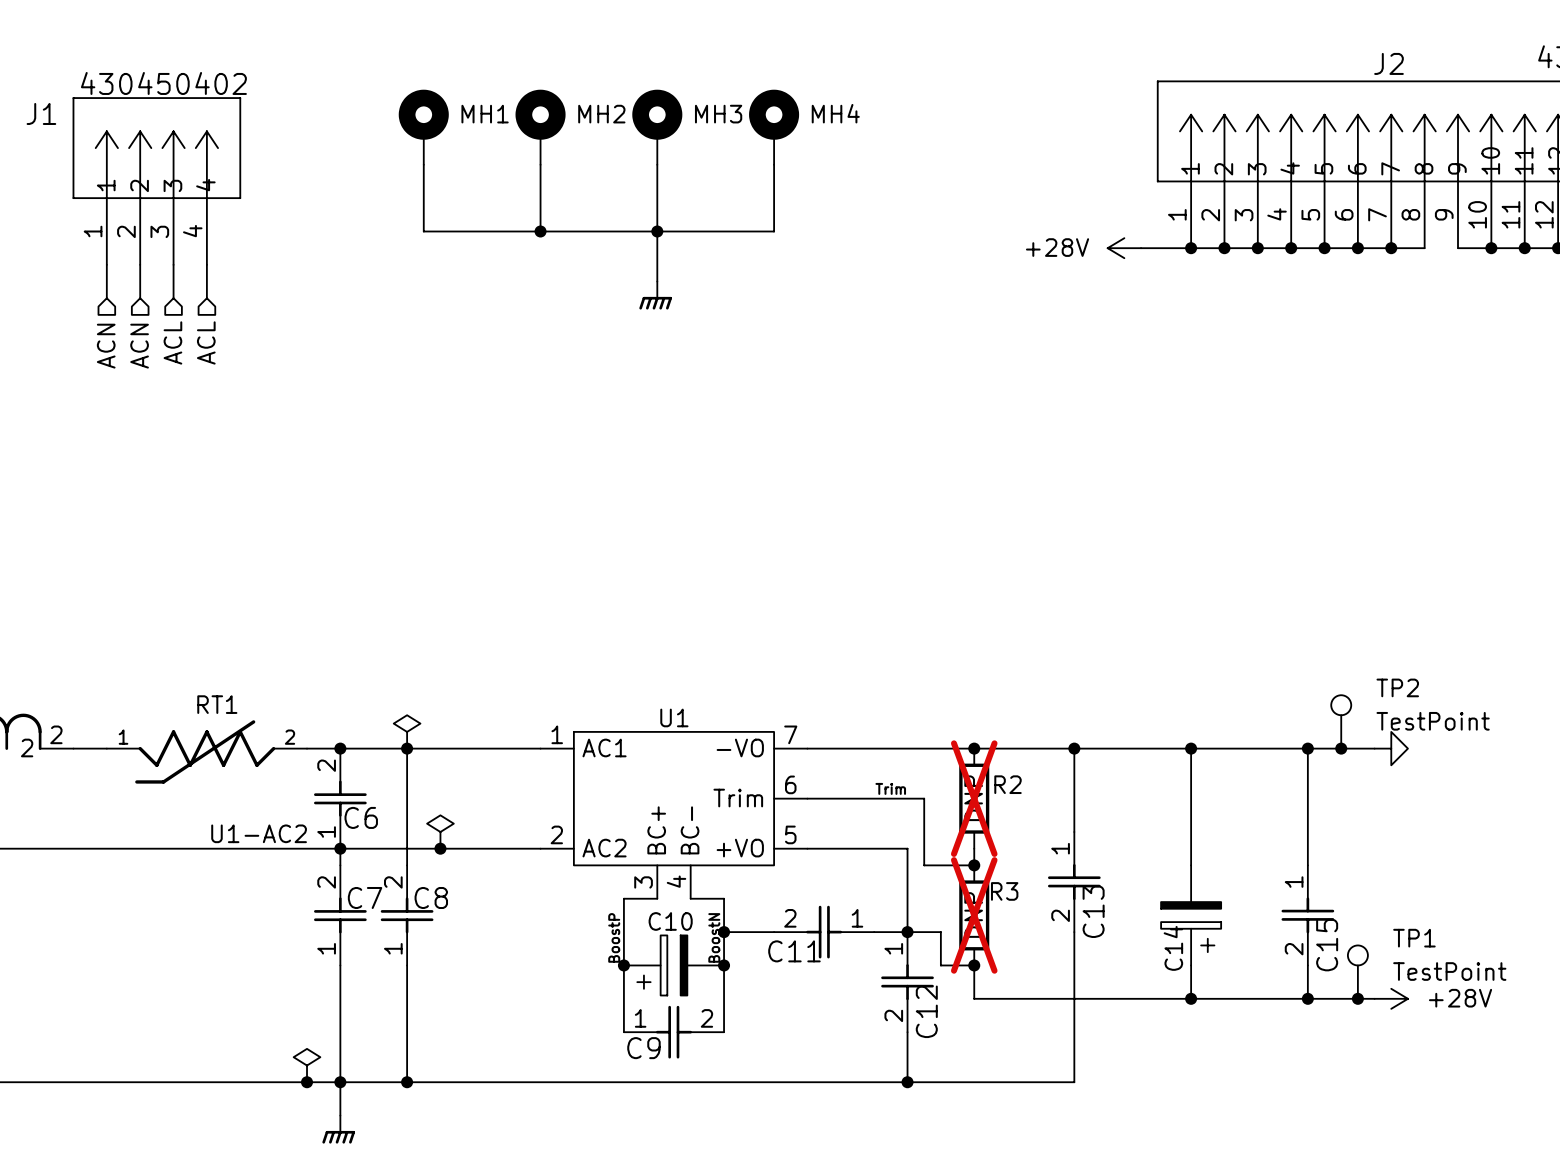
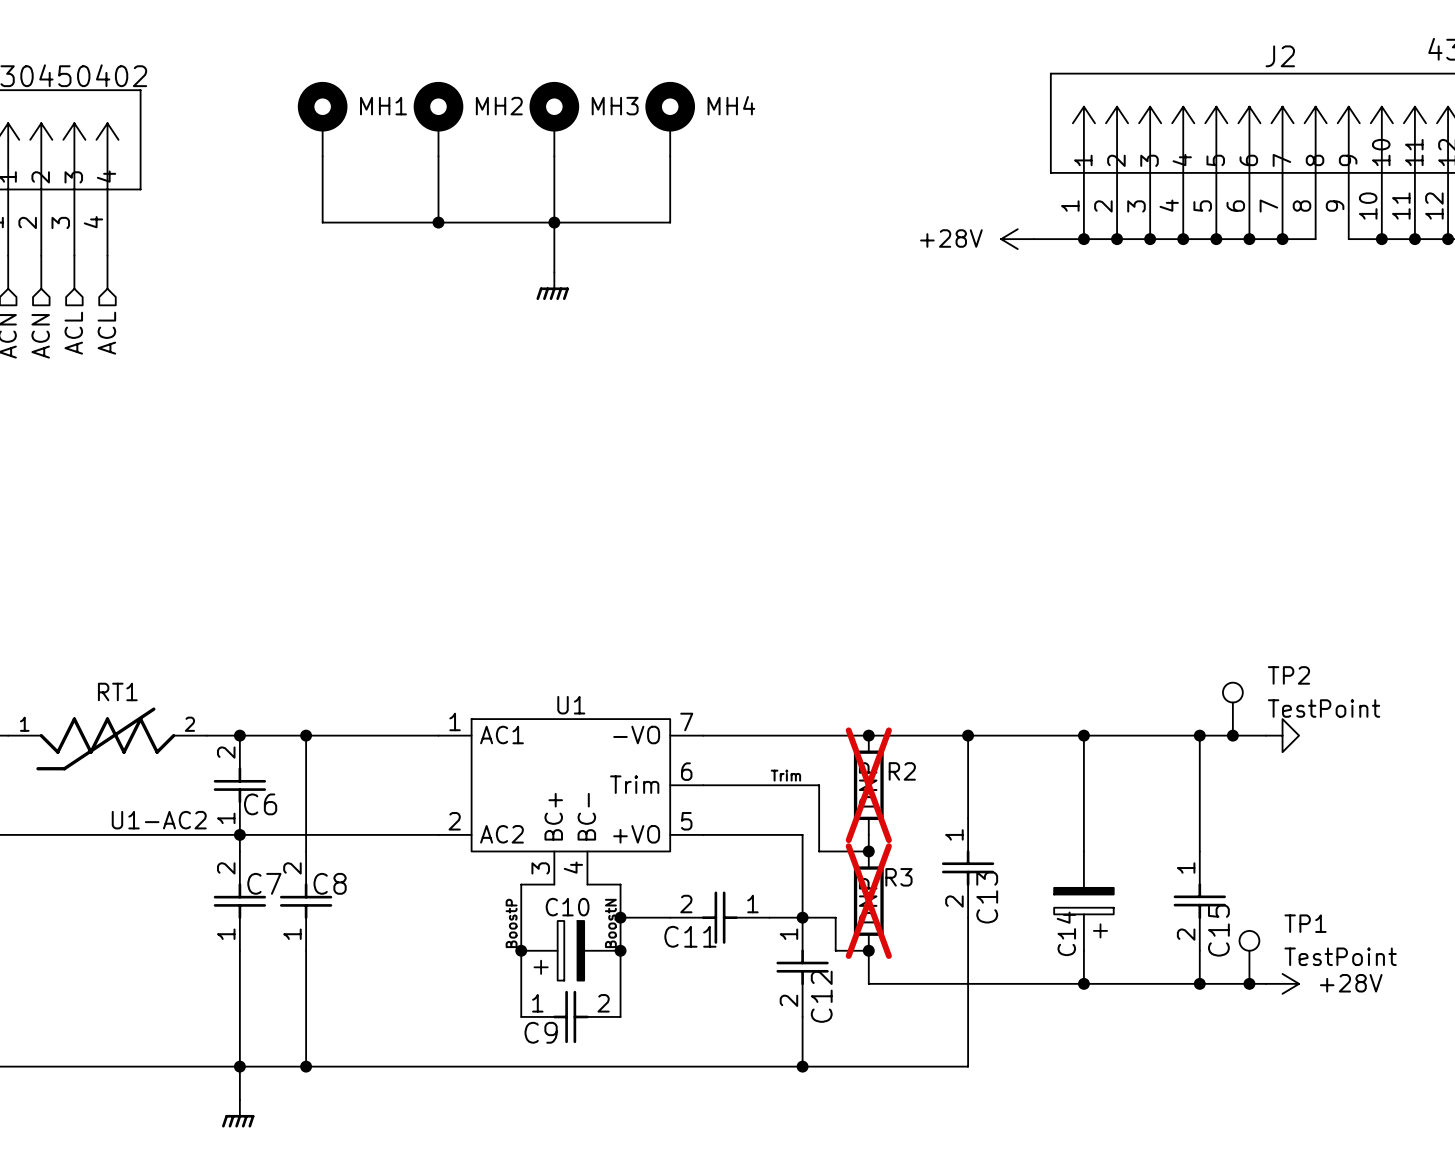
power symbol: (407, 731) -> none
power symbol: (440, 832) -> none
junction: (440, 848) -> none
power symbol: (307, 1065) -> none
junction: (307, 1082) -> none

